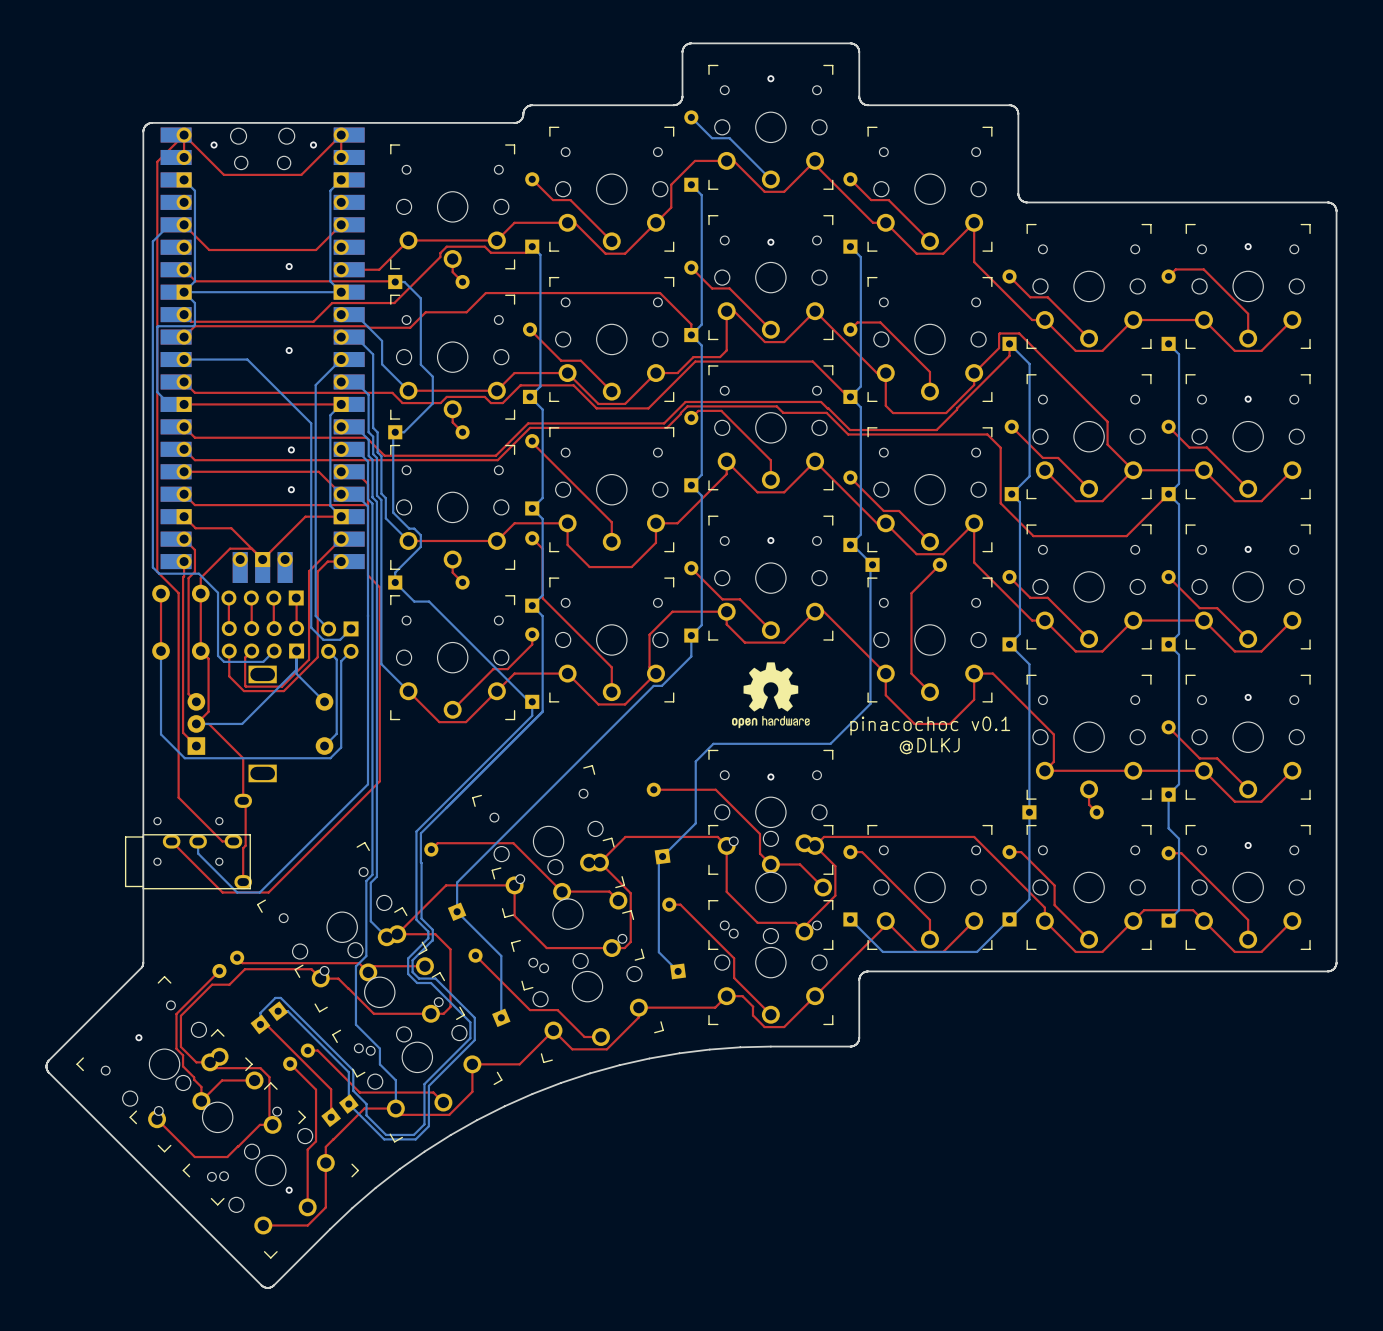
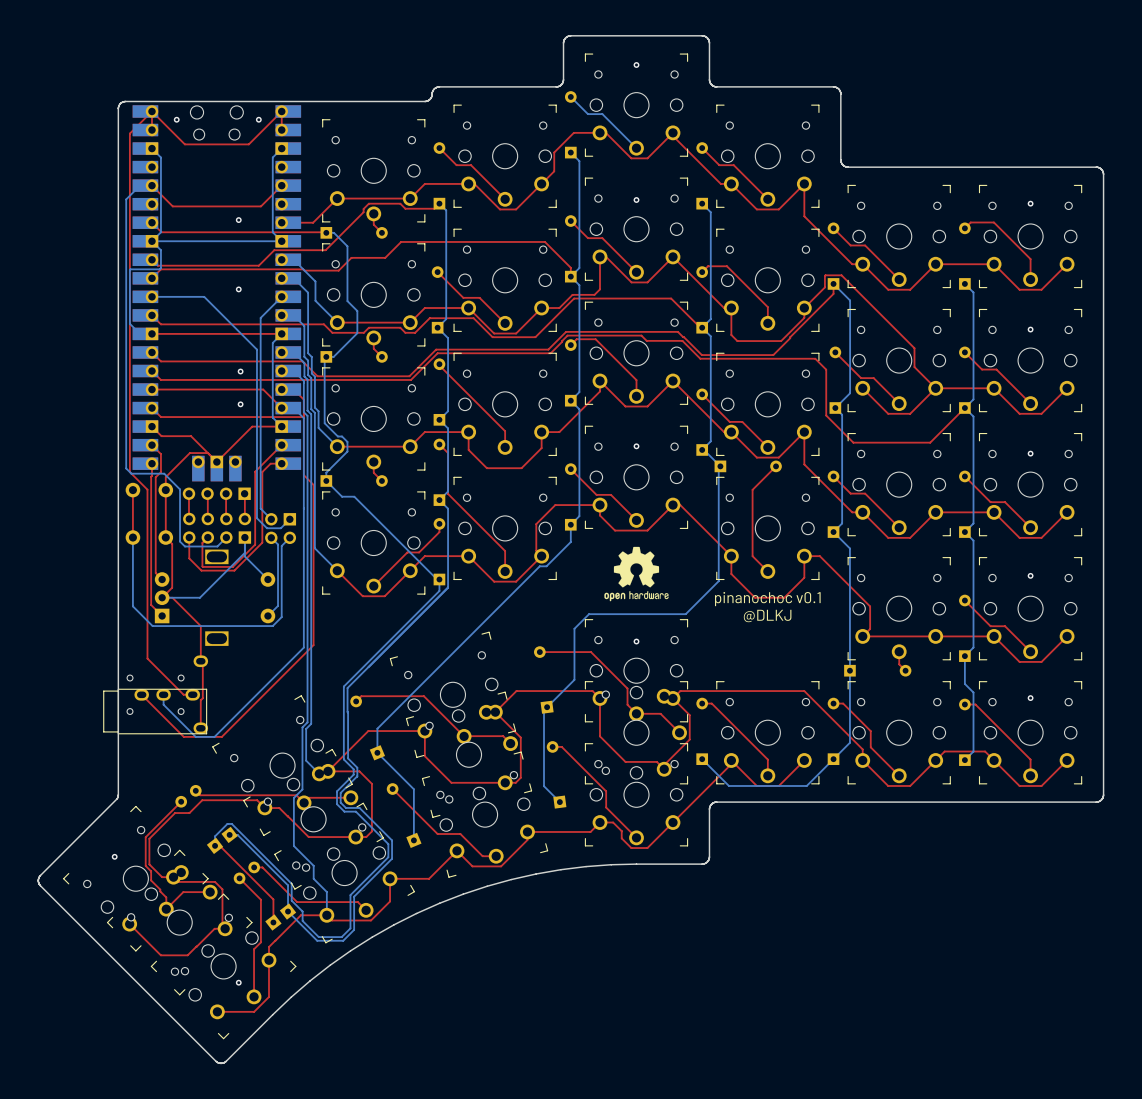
text: pinacochoc v0.1 (930, 726) -> pinanochoc v0.1 (767, 599)

